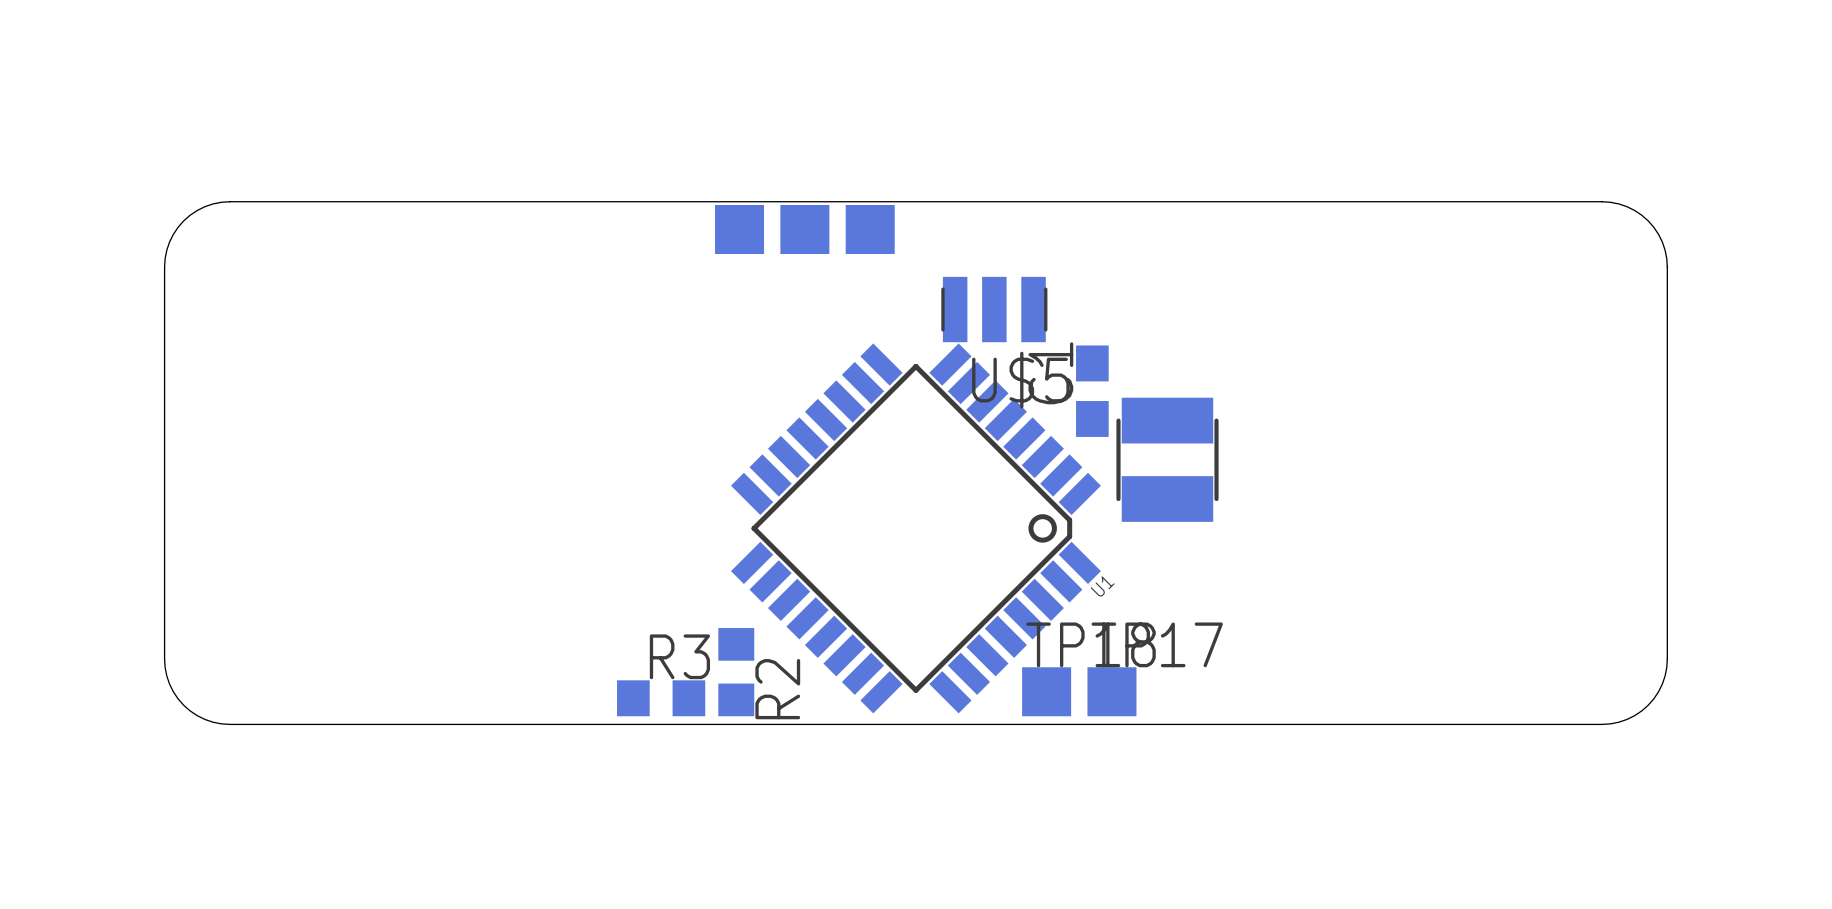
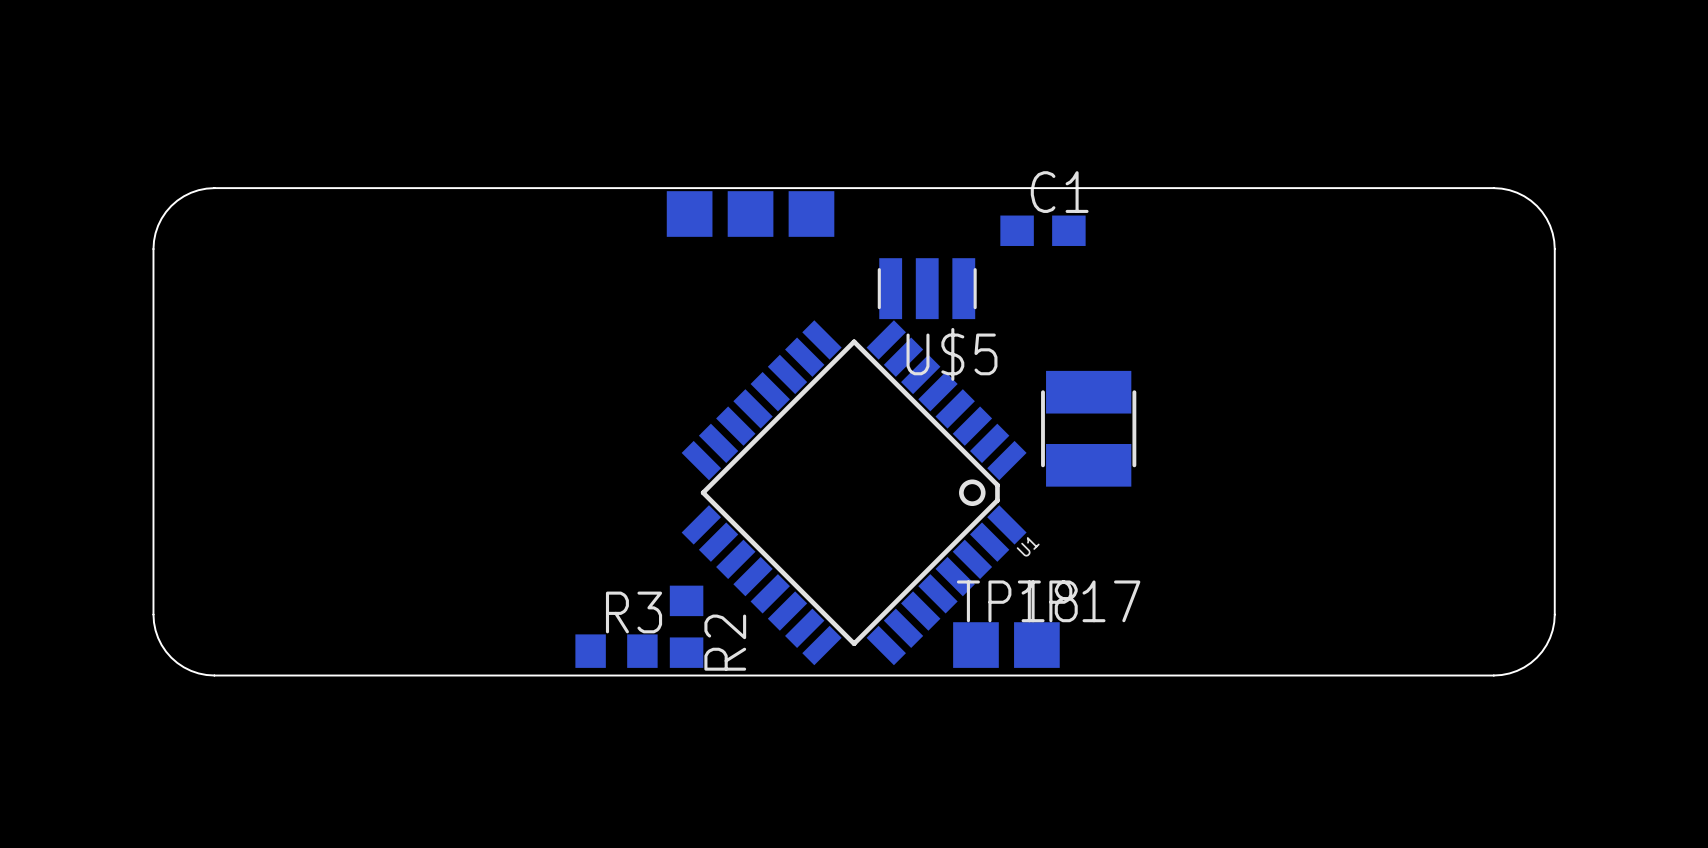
C1 rotation: 0° (1092, 391) -> 90° clockwise (1042, 230)
C1 position: (1092, 391) -> (1042, 230)

